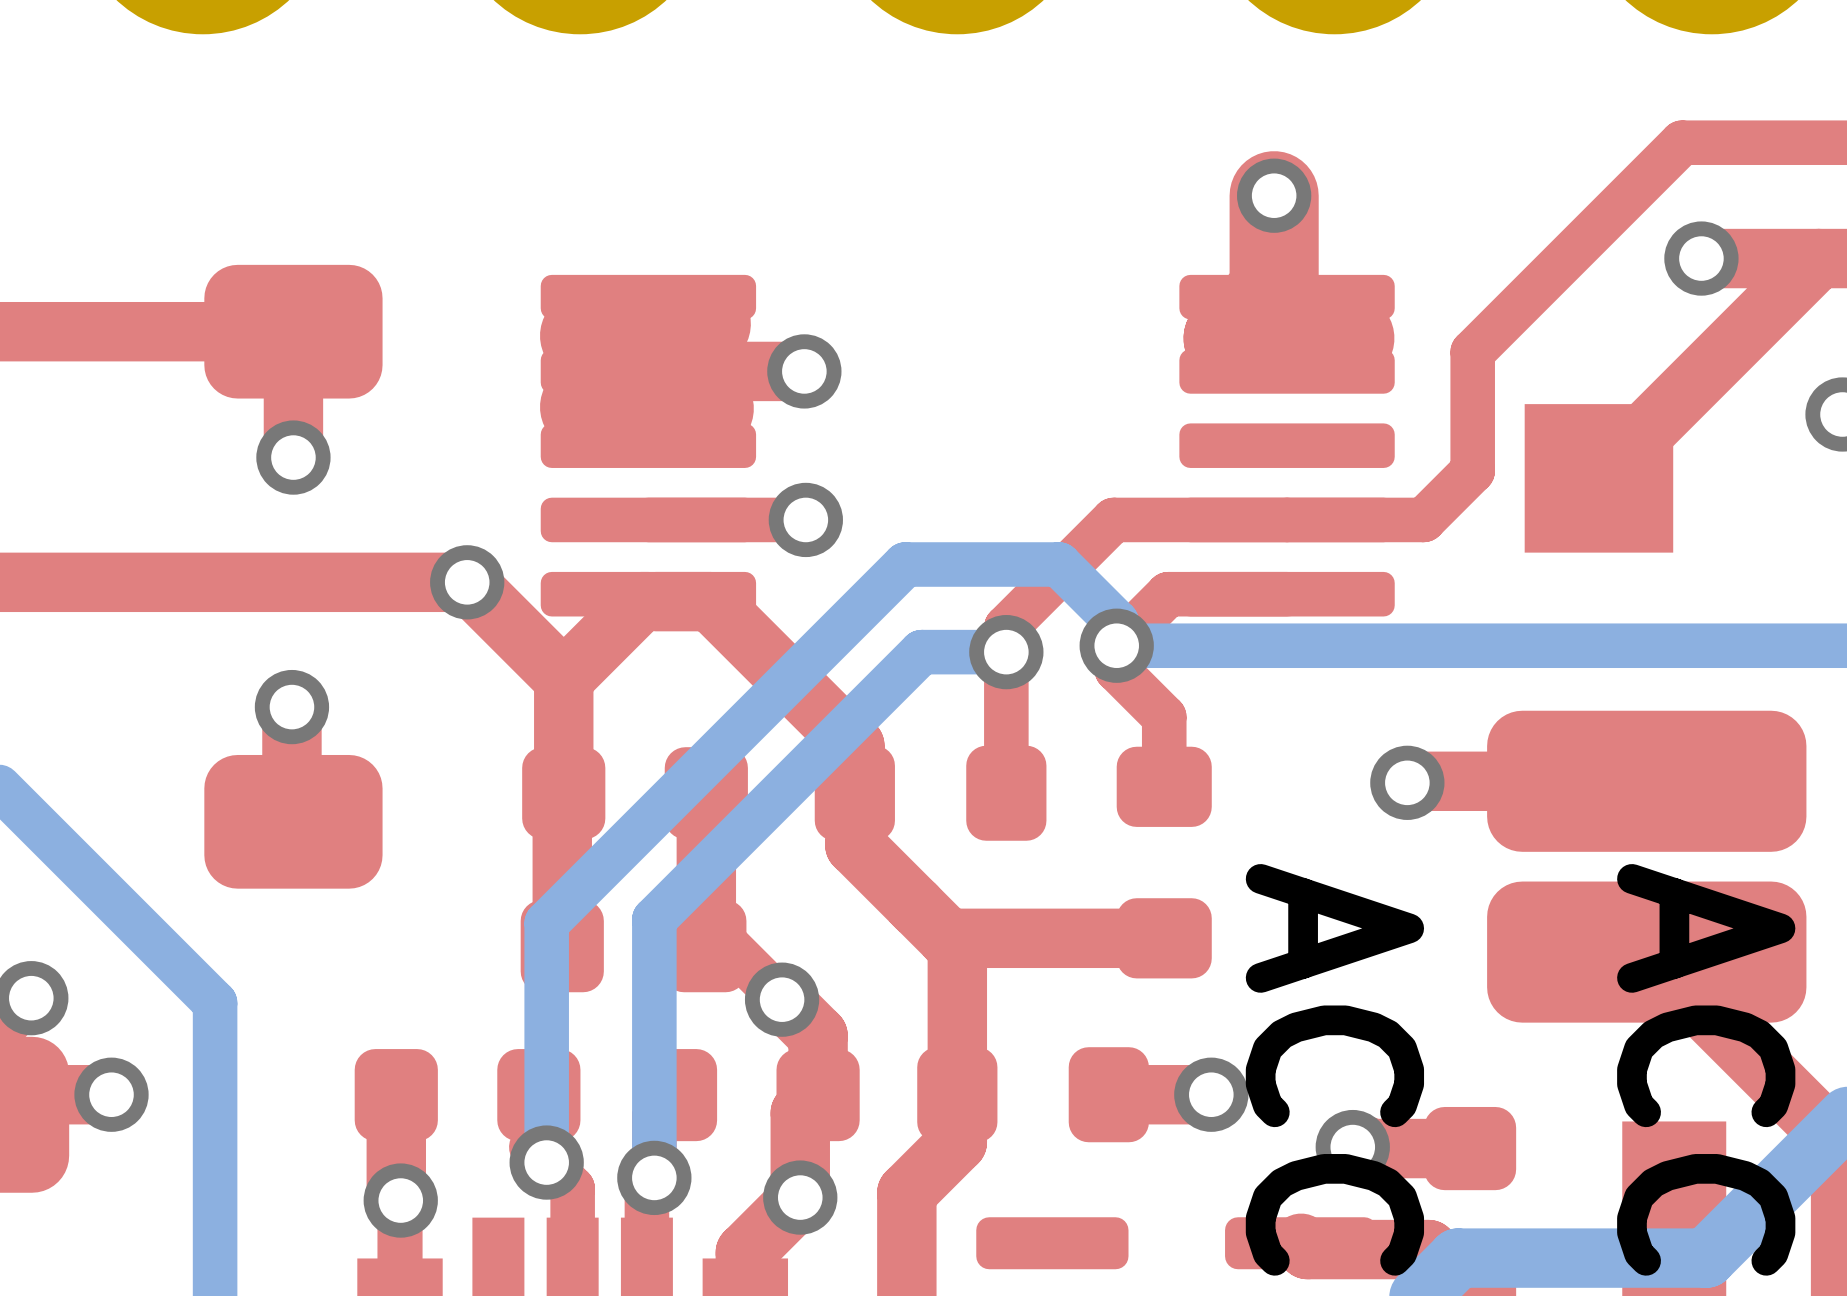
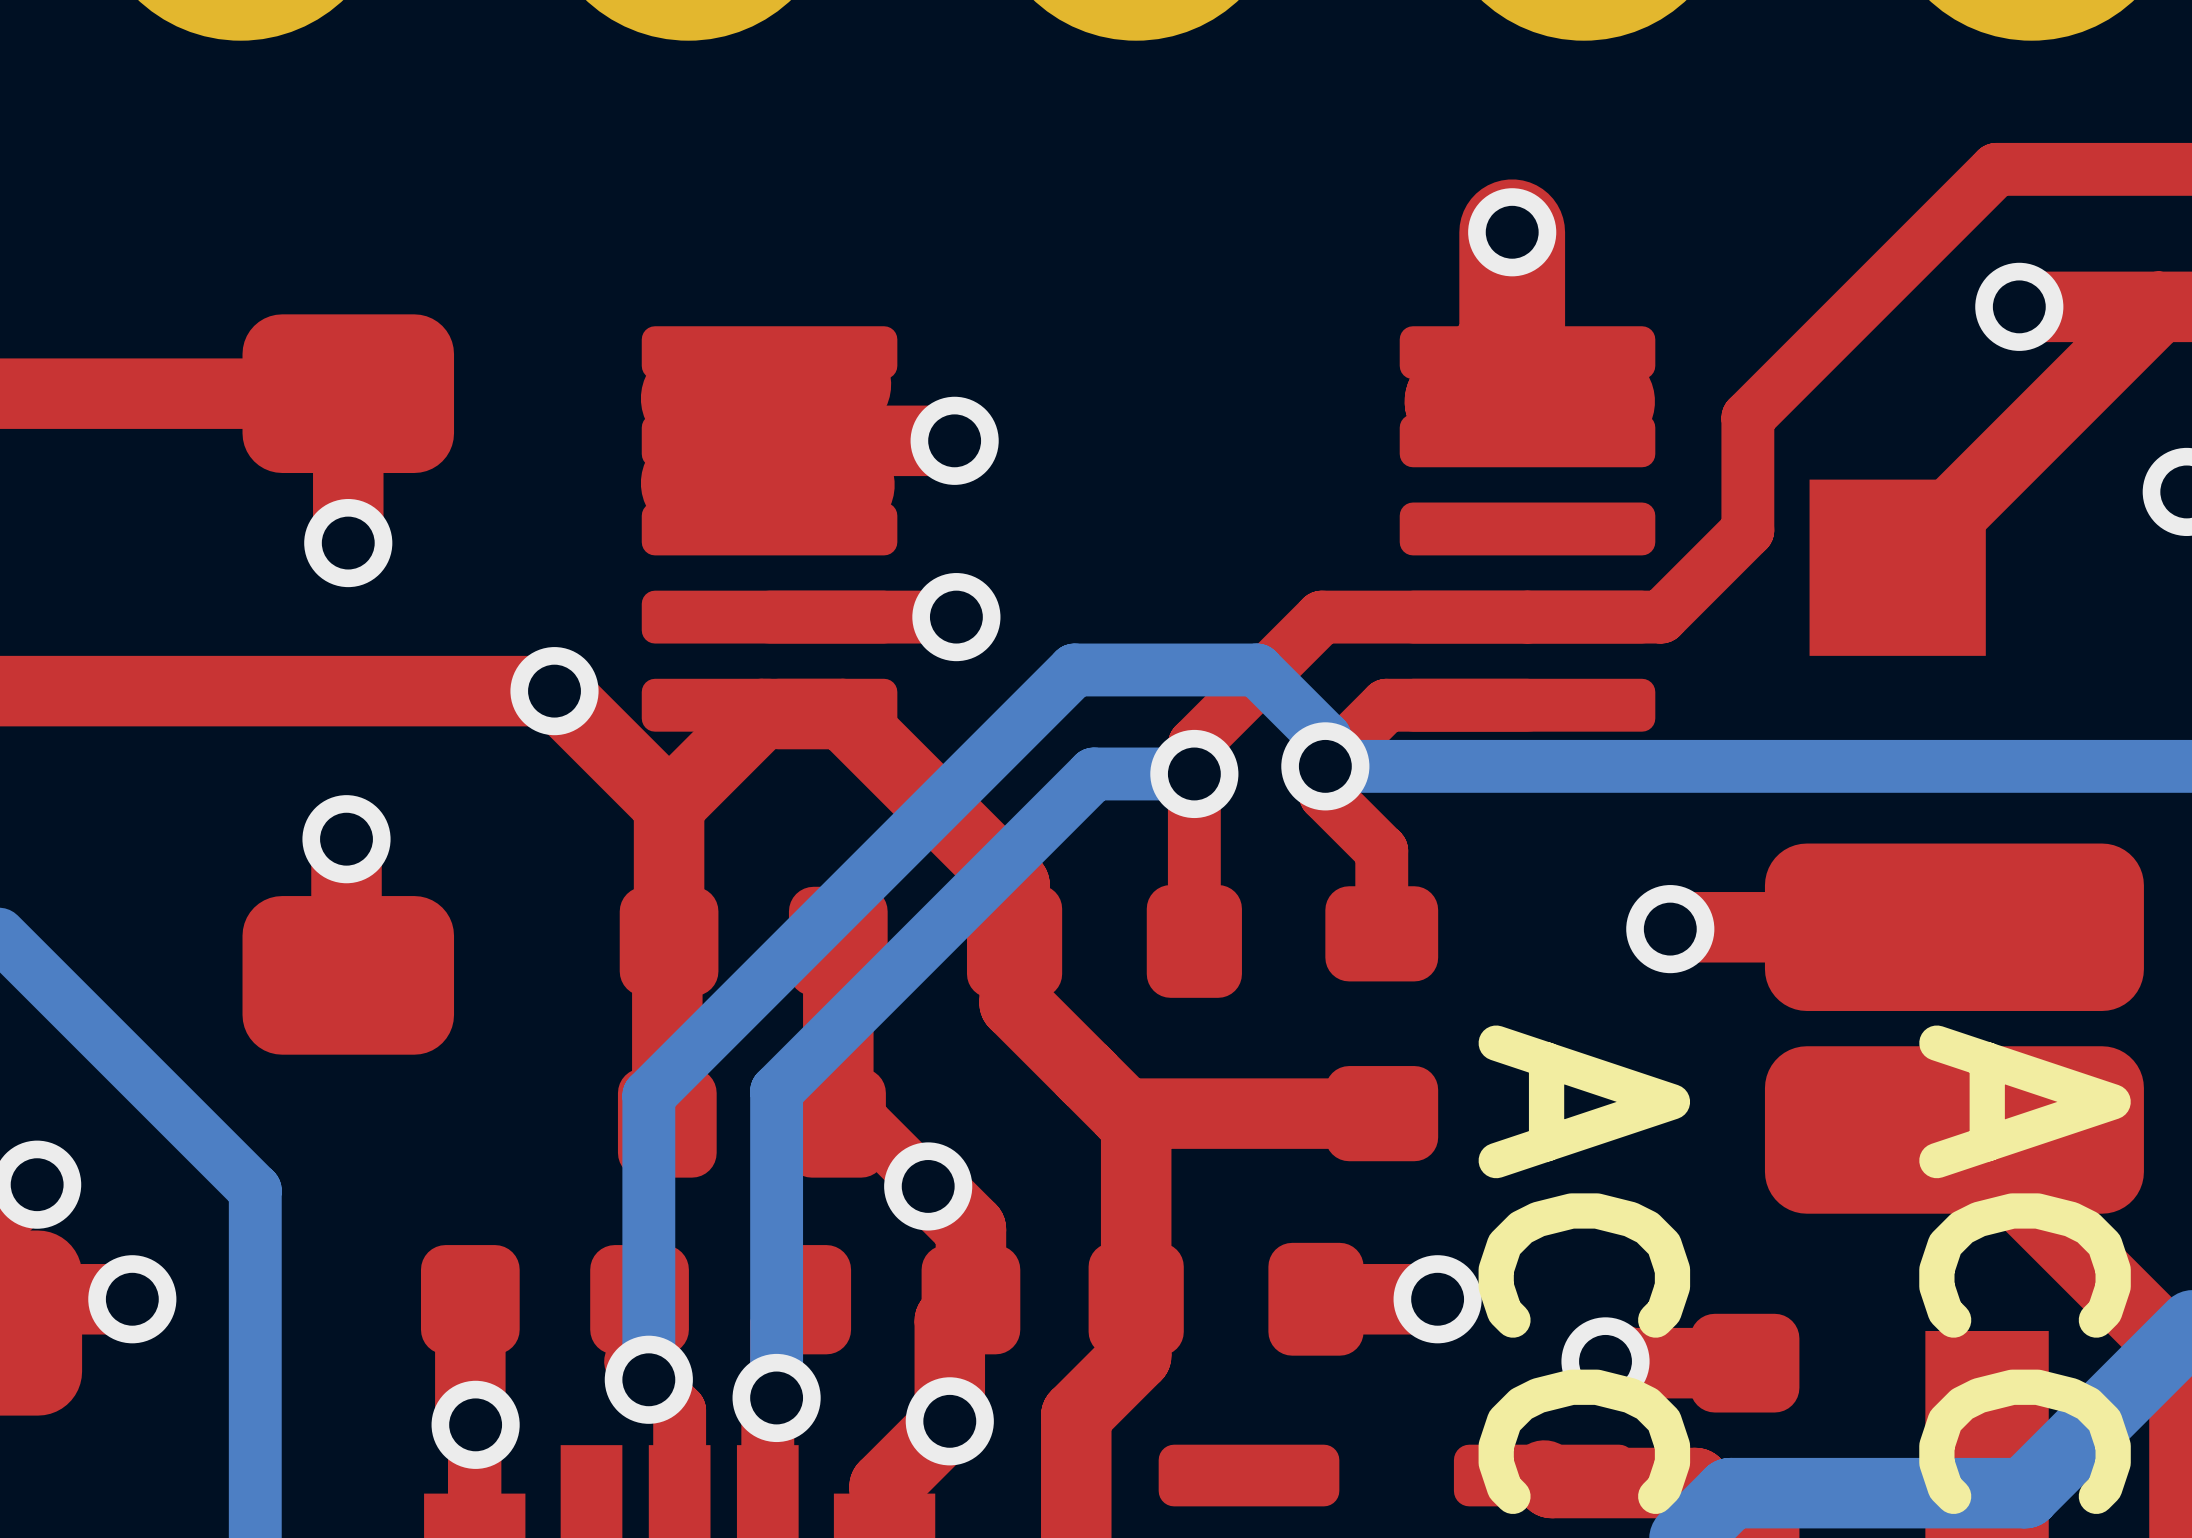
top track: (1472, 446) (1472, 470) (1423, 519) (1399, 519) -> (1747, 530) (1661, 617)

